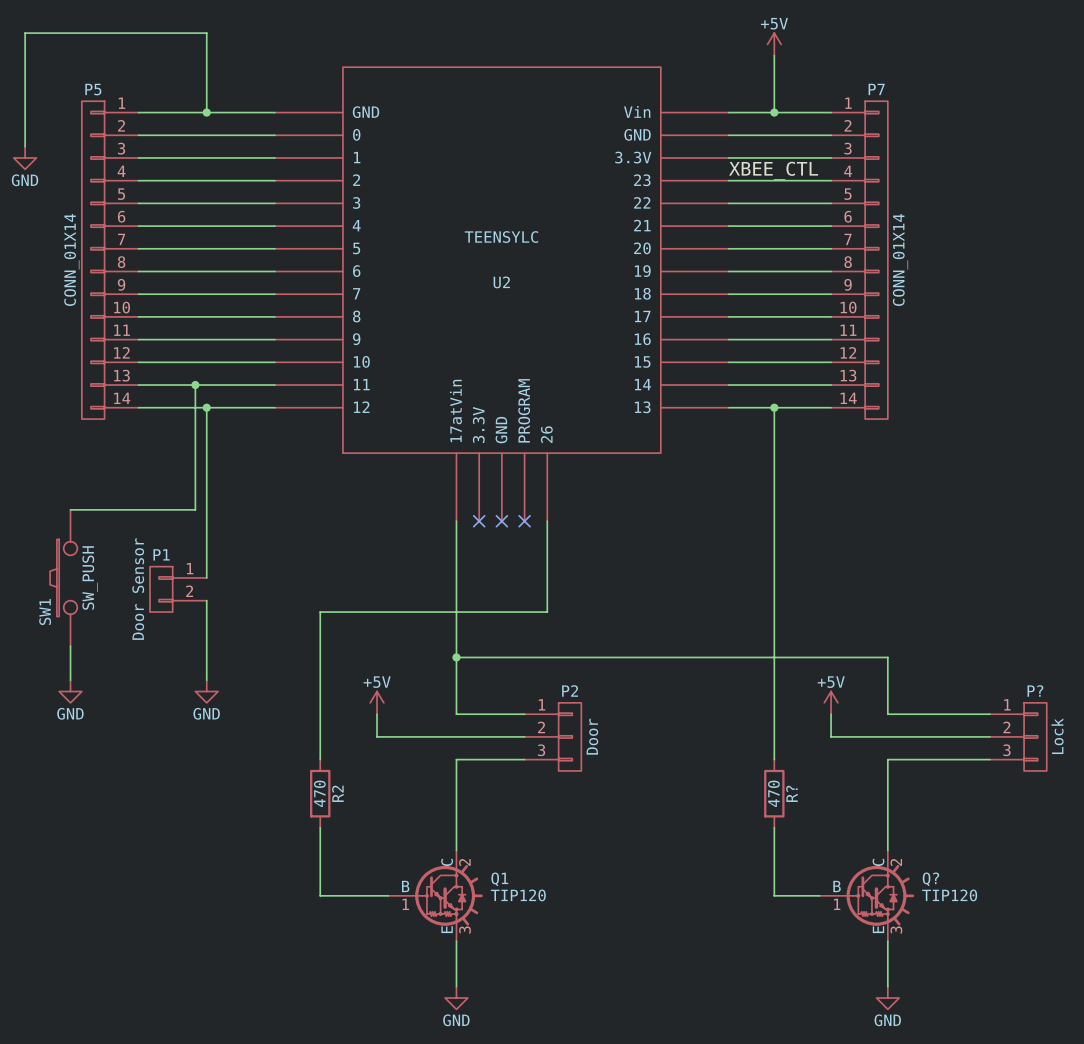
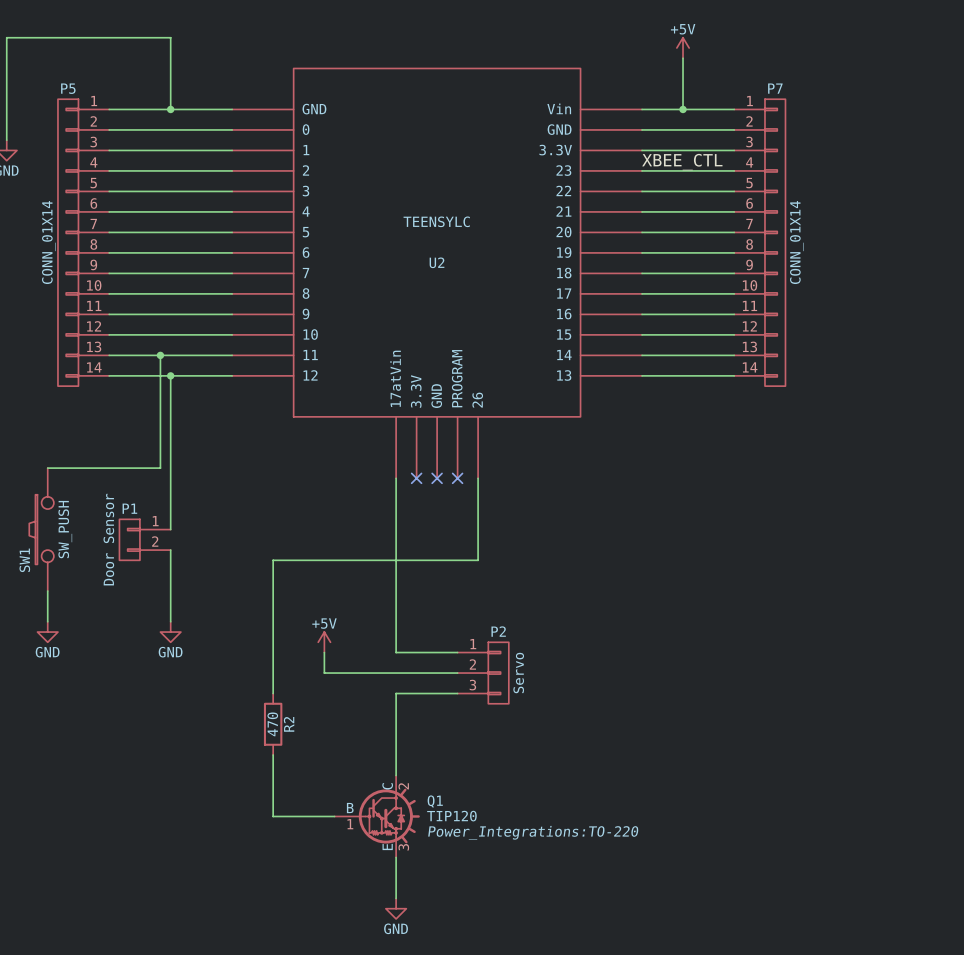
wire: (774, 407) (774, 759) -> none
junction: (774, 407) -> none
wire: (456, 657) (887, 657) (887, 714) (990, 714) -> none
junction: (456, 657) -> none
power symbol: +5V (831, 702) -> none
wire: (831, 714) (831, 736) (990, 736) -> none
P2 value: Door (592, 736) -> Servo (518, 673)
P?: Lock (1018, 736) -> none
wire: (990, 759) (887, 759) (887, 850) -> none
R?: 470 (774, 793) -> none
wire: (774, 827) (774, 895) (819, 895) -> none
Q?: TIP120 (866, 895) -> none
Q1 text: none -> Power_Integrations:TO-220 (533, 832)
wire: (887, 941) (887, 986) -> none
power symbol: GND (887, 998) -> none

